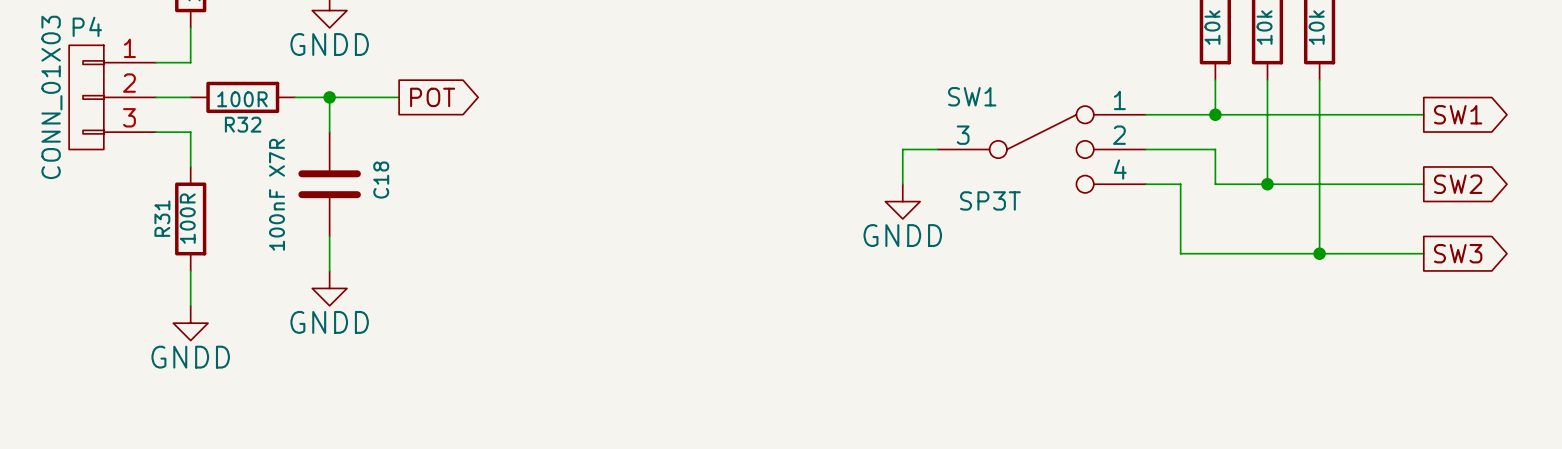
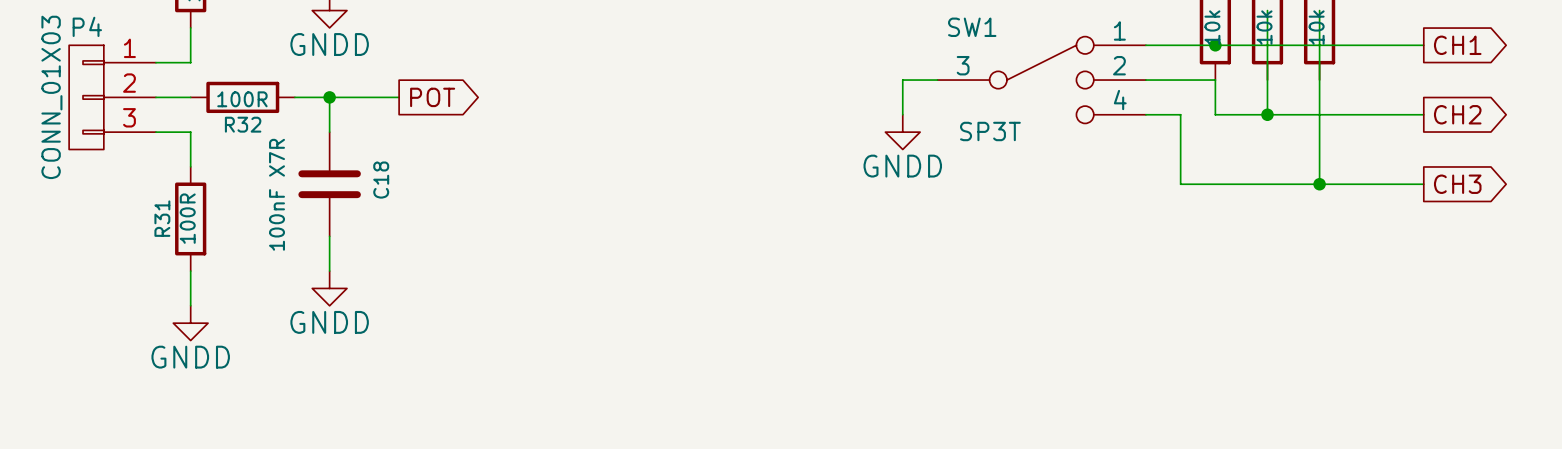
wire: none -> (1145, 45) (1423, 45)
junction: none -> (1215, 45)
global label: none -> CH1 (1457, 45)
wire: none -> (1145, 80) (1215, 80)
wire: (1180, 114) (1215, 114) -> none
junction: (1215, 114) -> none
wire: (1267, 114) (1267, 184) -> (1267, 10) (1267, 80)
junction: none -> (1267, 114)
global label: SW1 (1458, 114) -> CH2 (1457, 114)
wire: (937, 149) (902, 149) (902, 184) -> (937, 80) (902, 80) (902, 114)
SW1 position: (1041, 149) -> (1041, 80)
wire: (1145, 149) (1215, 149) (1215, 184) -> (1180, 114) (1180, 184) (1215, 184)
wire: (1145, 184) (1180, 184) (1180, 253) (1423, 253) -> none
junction: (1267, 184) -> none
wire: (1319, 184) (1319, 253) -> (1319, 10) (1319, 80)
junction: none -> (1319, 184)
global label: SW2 (1458, 184) -> CH3 (1457, 184)
power symbol position: GNDD (902, 201) -> GNDD (902, 132)
junction: (1319, 253) -> none
global label: SW3 (1458, 253) -> none

